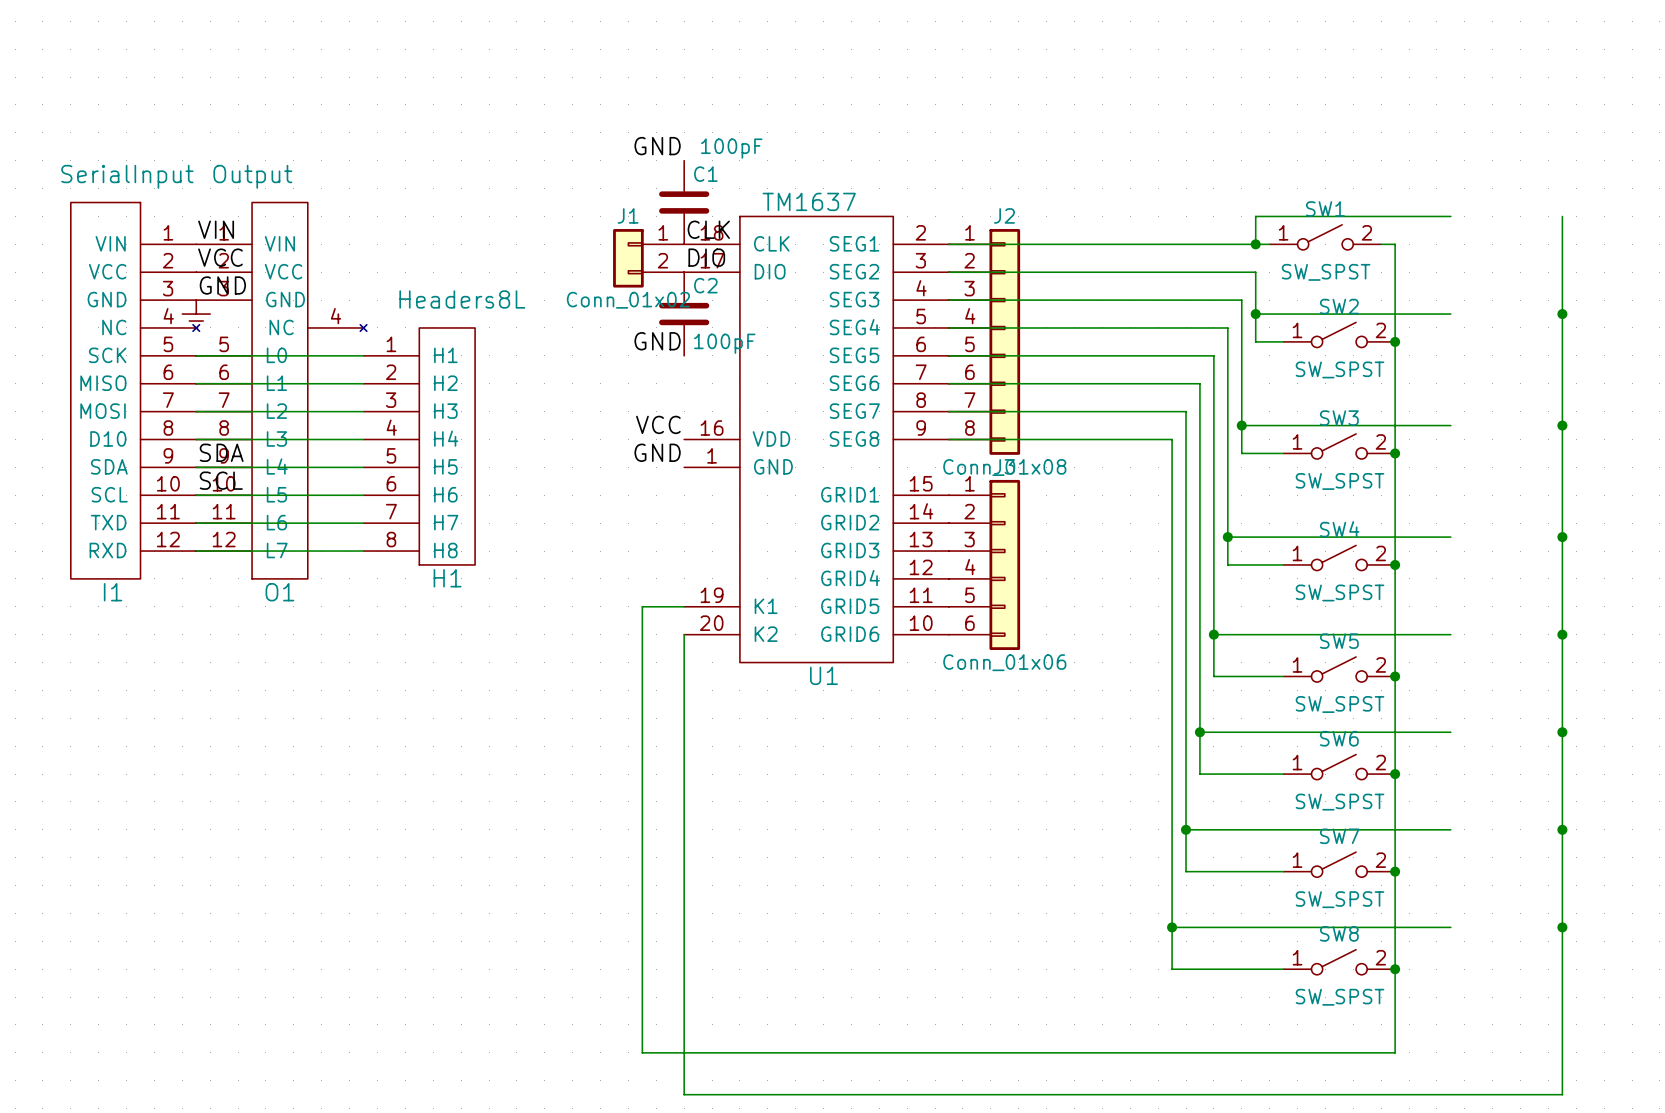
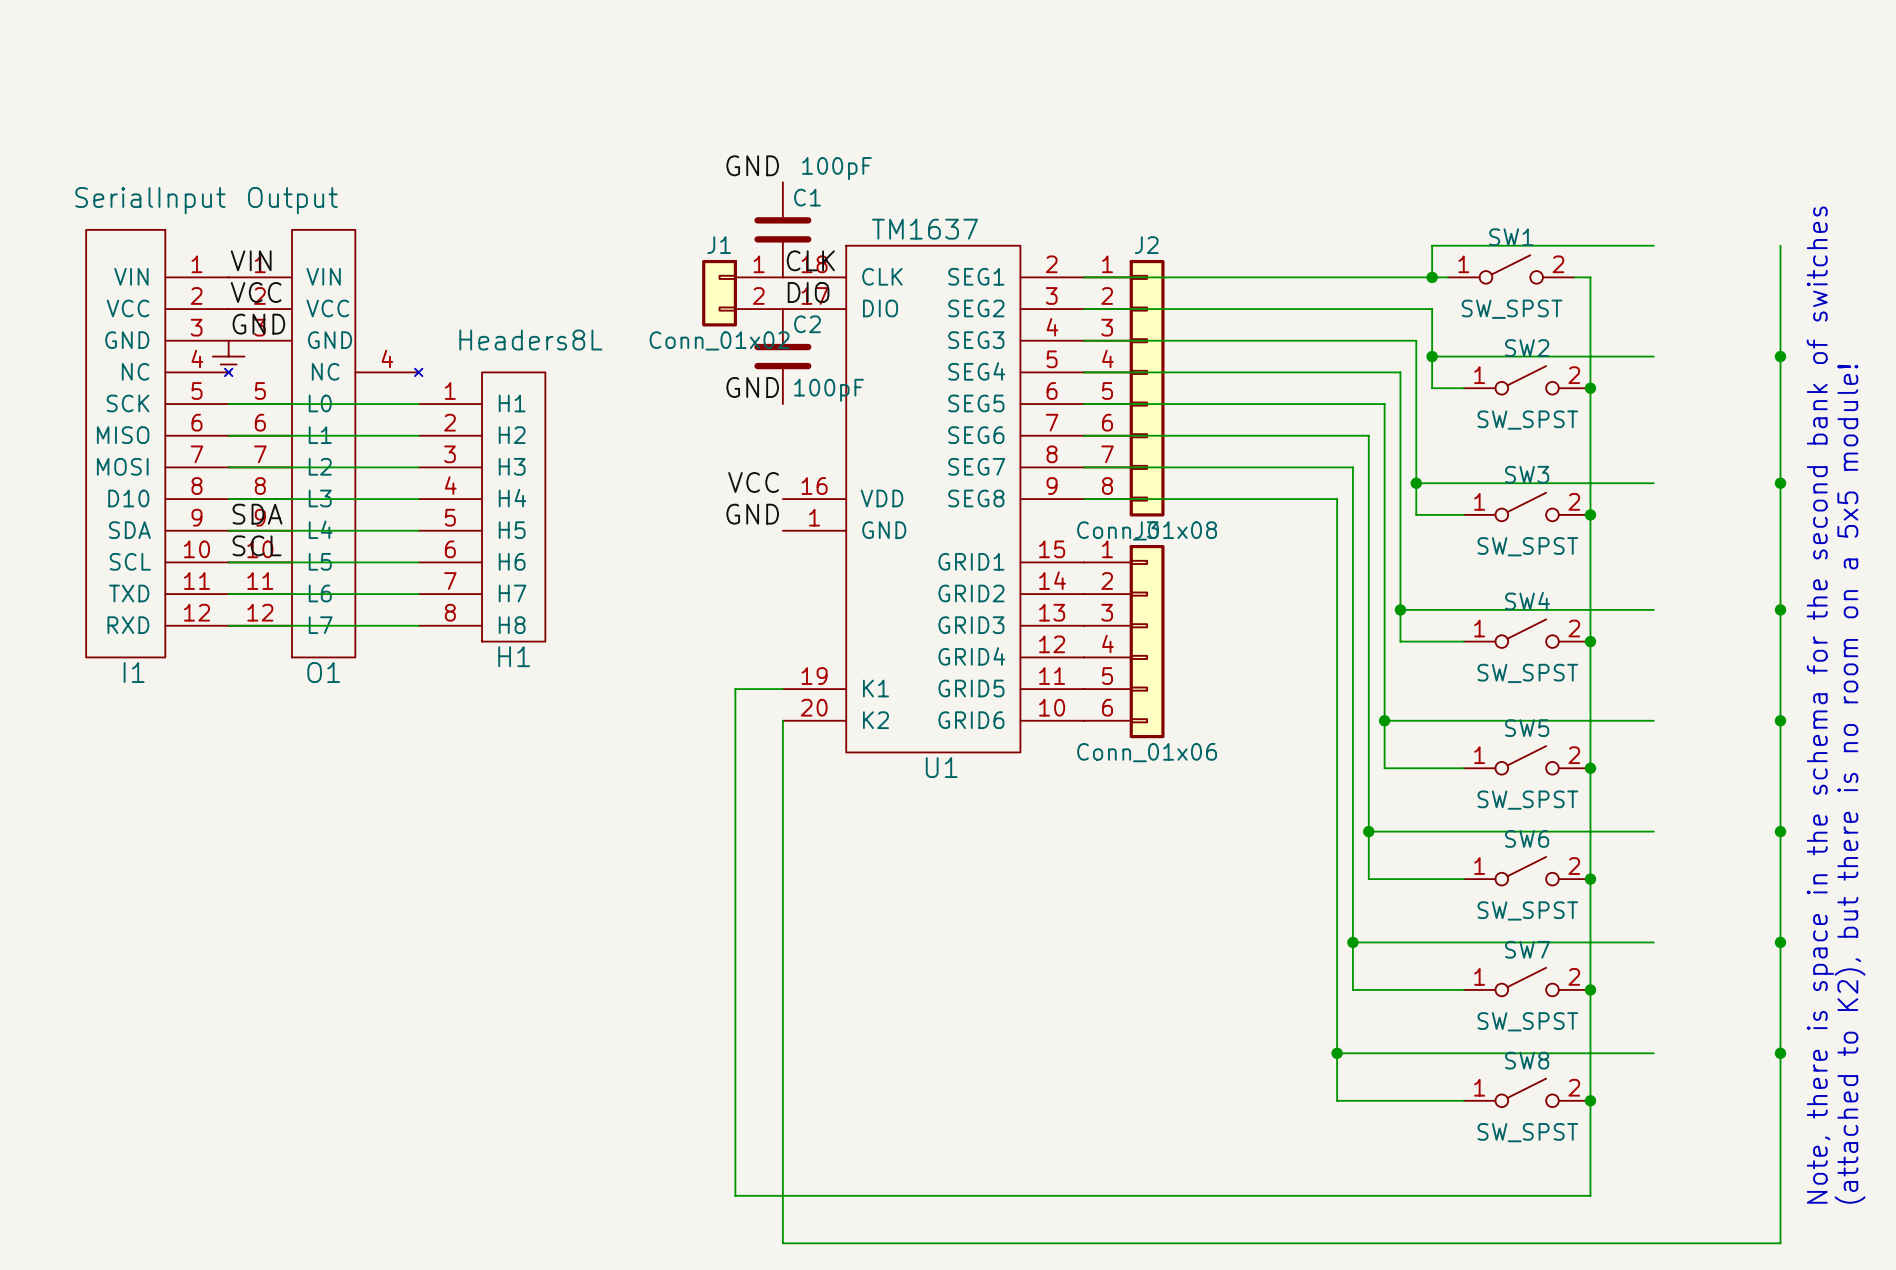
text: none -> Note, there is space in the schema for the second bank of switches (1820, 705)
text: none -> (attached to K2), but there is no room on a 5x5 module! (1850, 784)

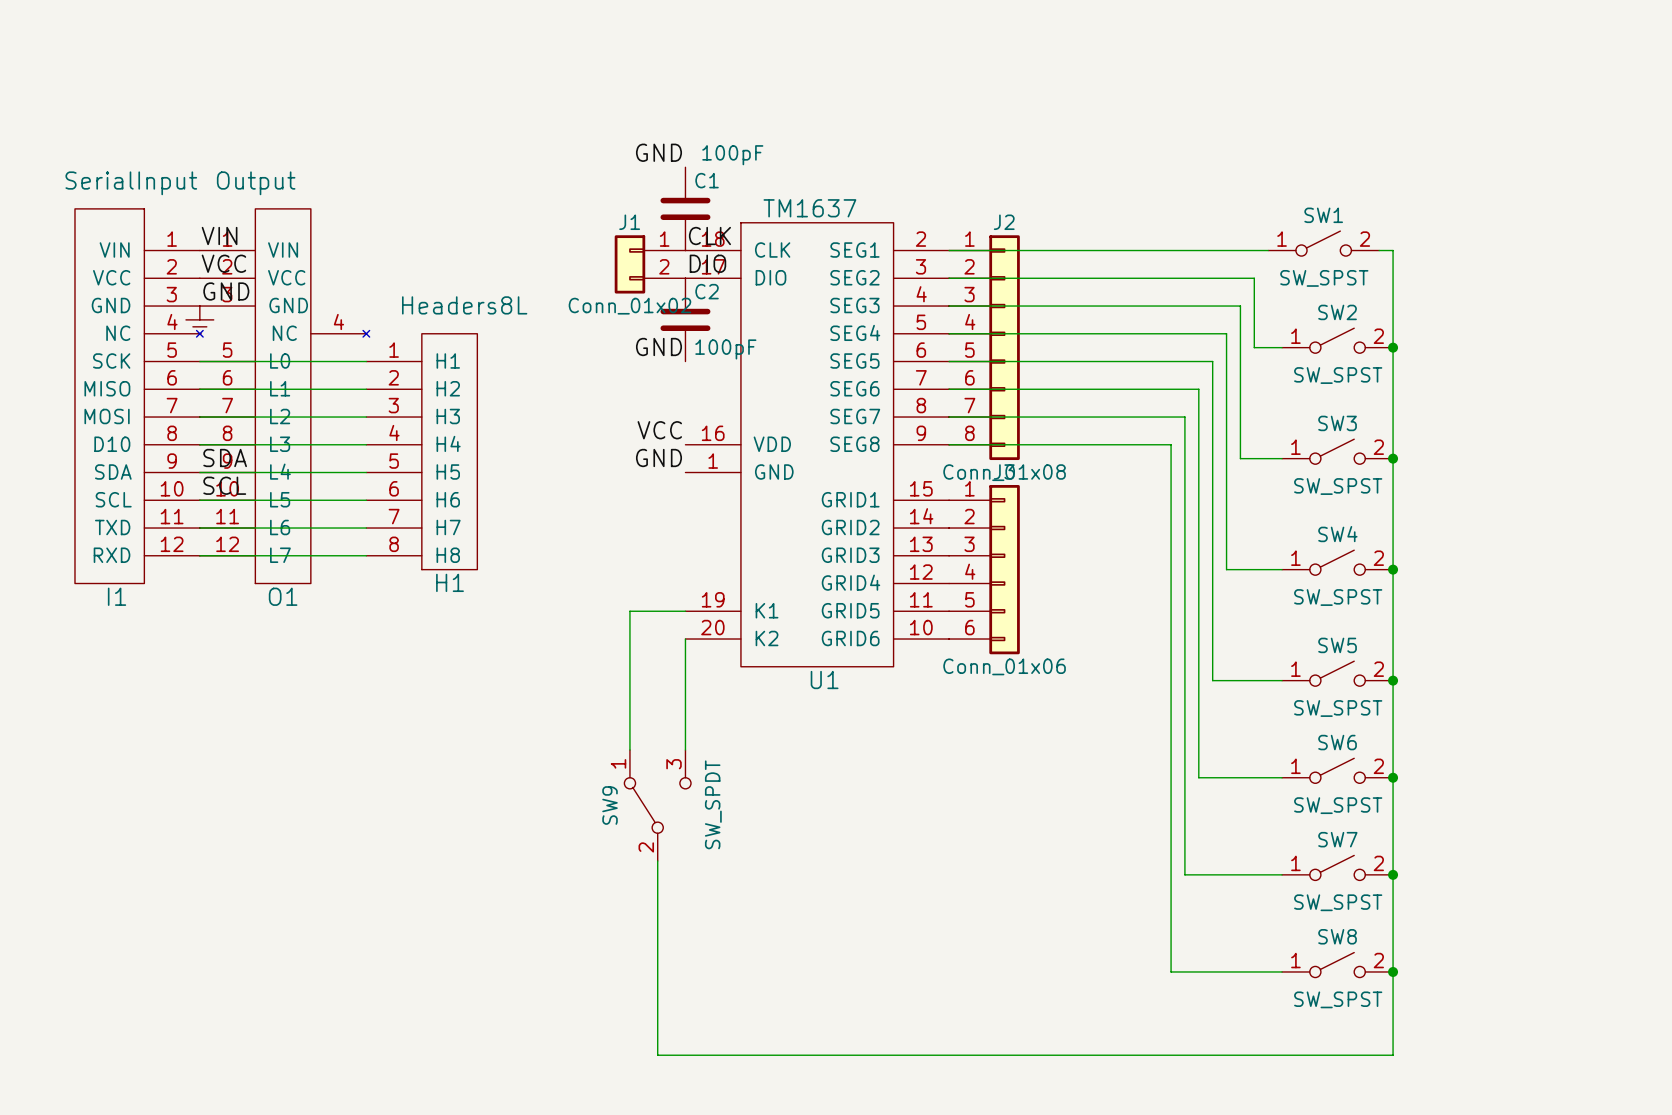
wire: (1653, 245) (1432, 245) (1432, 277) -> none
wire: (1780, 245) (1780, 1243) (782, 1243) (782, 847) -> none
junction: (1432, 277) -> none
wire: (1432, 356) (1653, 356) -> none
junction: (1432, 356) -> none
junction: (1780, 356) -> none
wire: (1416, 483) (1653, 483) -> none
junction: (1416, 483) -> none
junction: (1780, 483) -> none
wire: (1400, 609) (1653, 609) -> none
junction: (1400, 609) -> none
junction: (1780, 609) -> none
wire: (735, 689) (735, 1195) (751, 1195) -> (657, 860) (657, 1055)
wire: none -> (643, 611) (629, 611) (629, 750)
text: Note, there is space in the schema for the second bank of switches (1820, 705) -> none
wire: (1384, 720) (1653, 720) -> none
junction: (1384, 720) -> none
junction: (1780, 720) -> none
text: (attached to K2), but there is no room on a 5x5 module! (1850, 784) -> none
wire: (1368, 831) (1653, 831) -> none
junction: (1368, 831) -> none
junction: (1780, 831) -> none
SW9: none -> SW_SPDT (657, 805)
wire: (1352, 942) (1653, 942) -> none
junction: (1352, 942) -> none
junction: (1780, 942) -> none
wire: (1337, 1053) (1653, 1053) -> none
junction: (1337, 1053) -> none
junction: (1780, 1053) -> none

